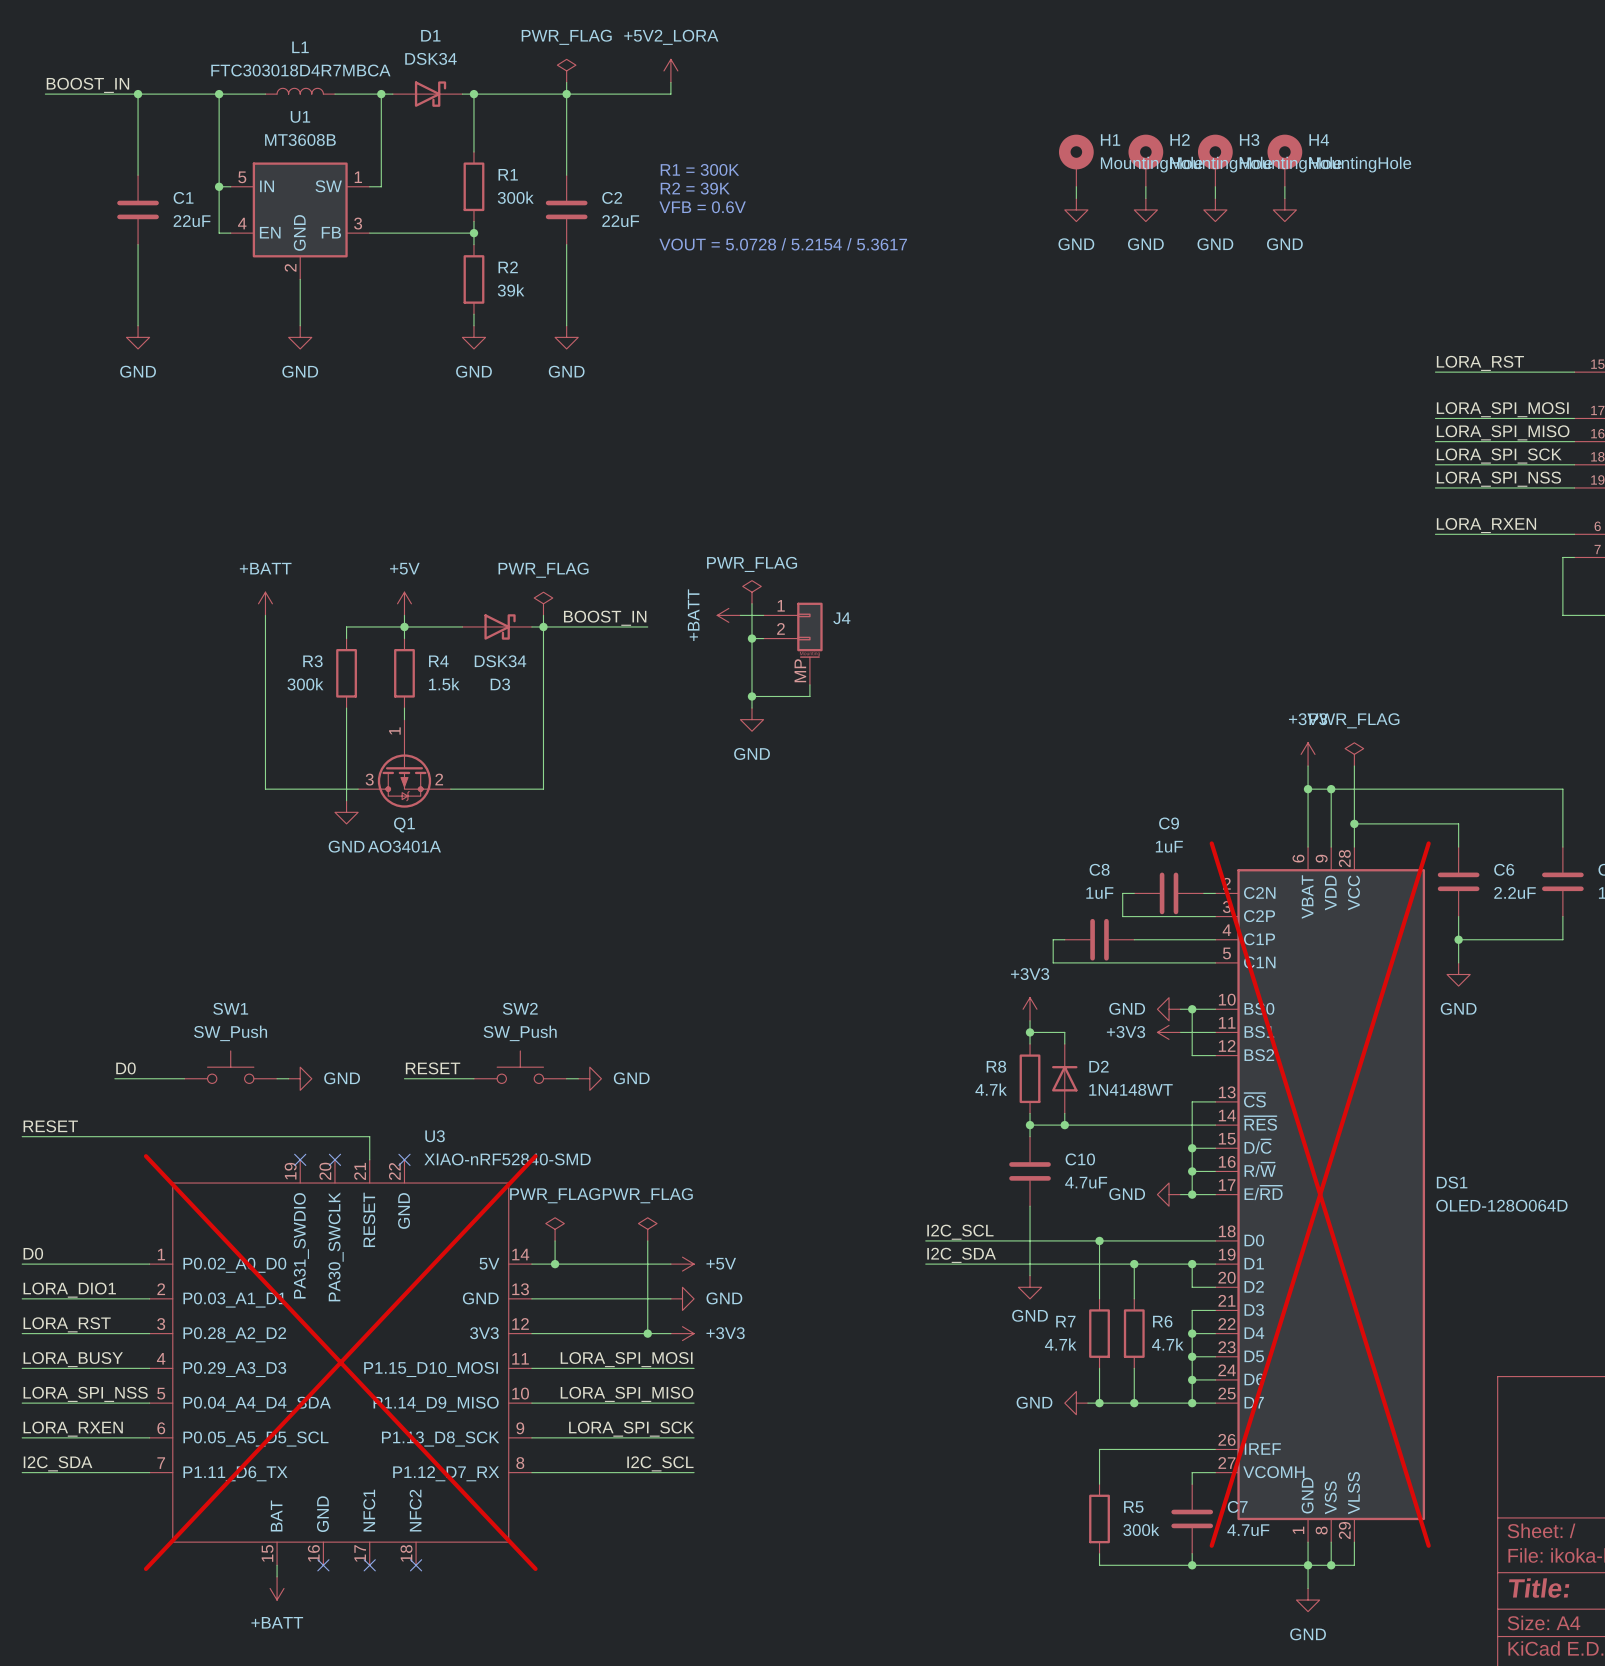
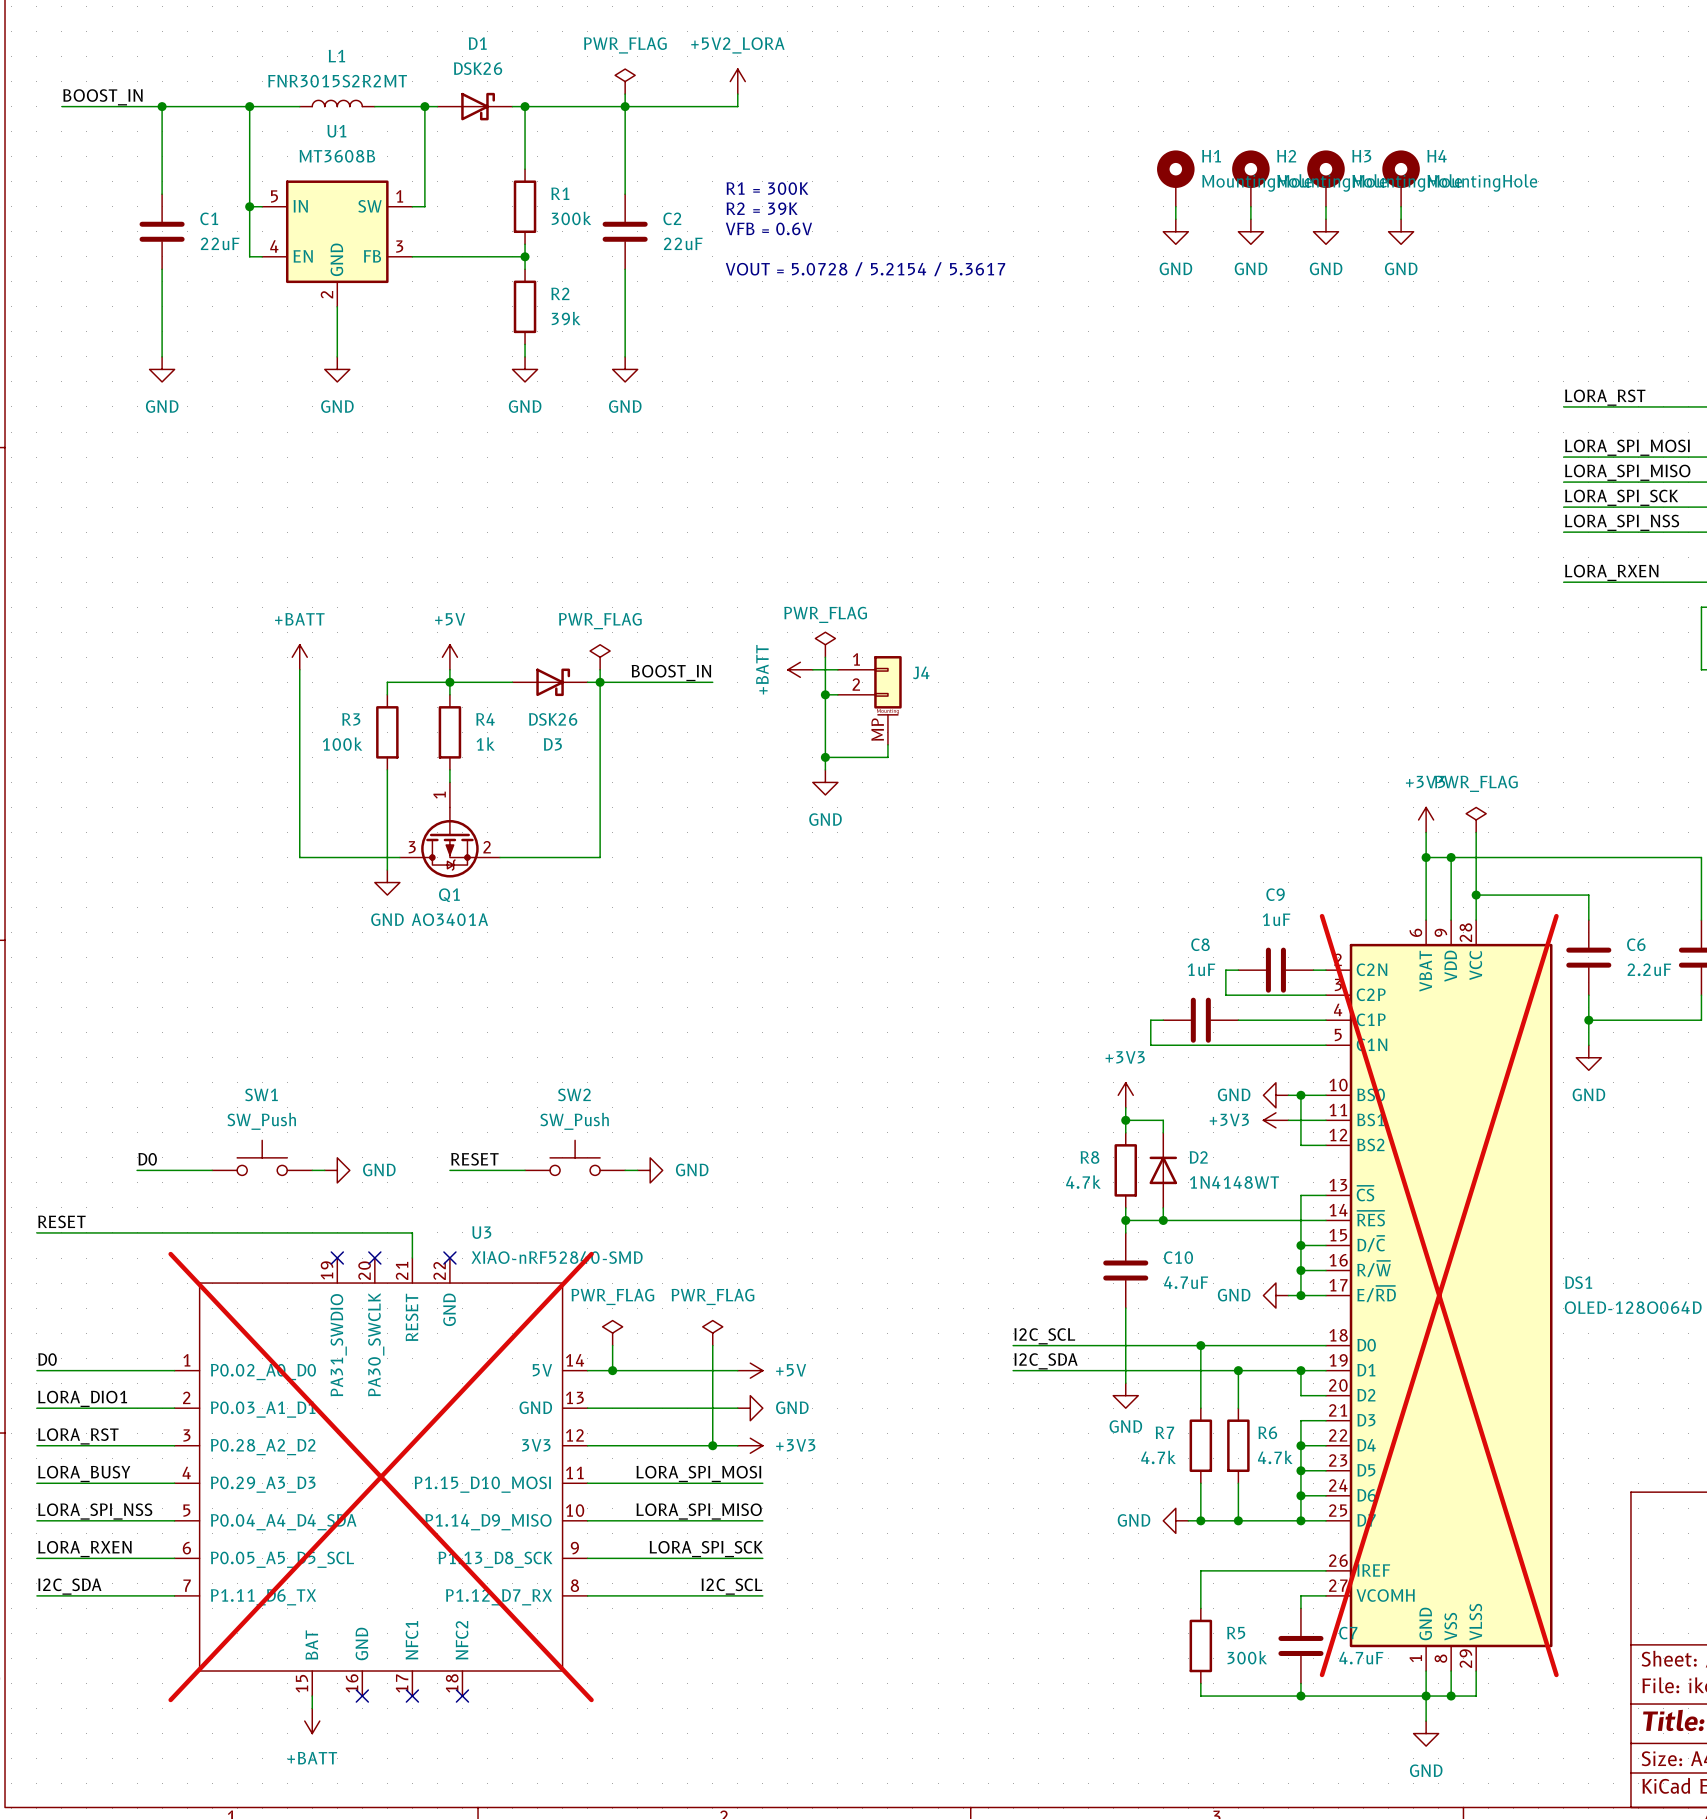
D1 value: DSK34 (430, 58) -> DSK26 (478, 68)
L1 value: FTC303018D4R7MBCA (300, 70) -> FNR3015S2R2MT (337, 81)
D3 value: DSK34 (500, 661) -> DSK26 (553, 719)
R3 value: 300k (305, 684) -> 100k (342, 744)
R4 value: 1.5k (444, 684) -> 1k (485, 744)

